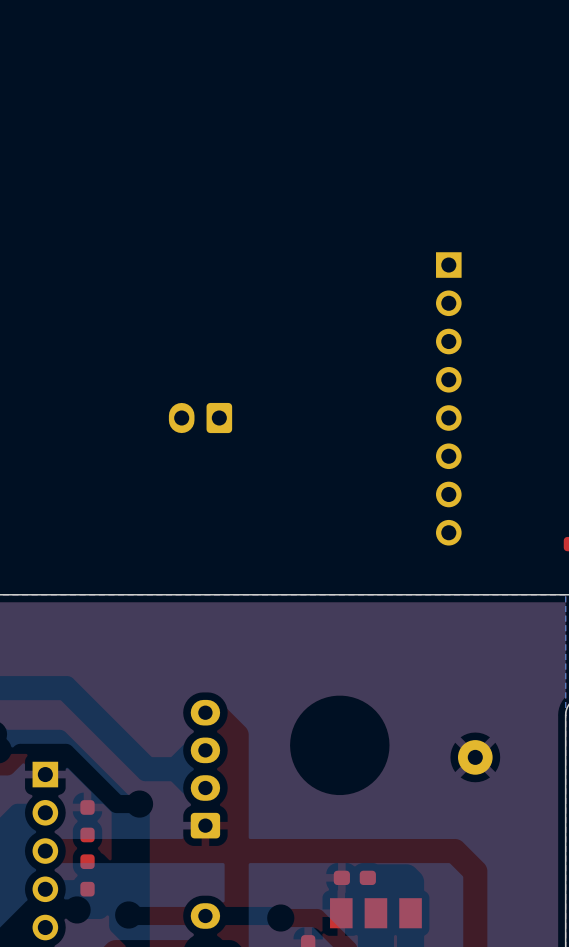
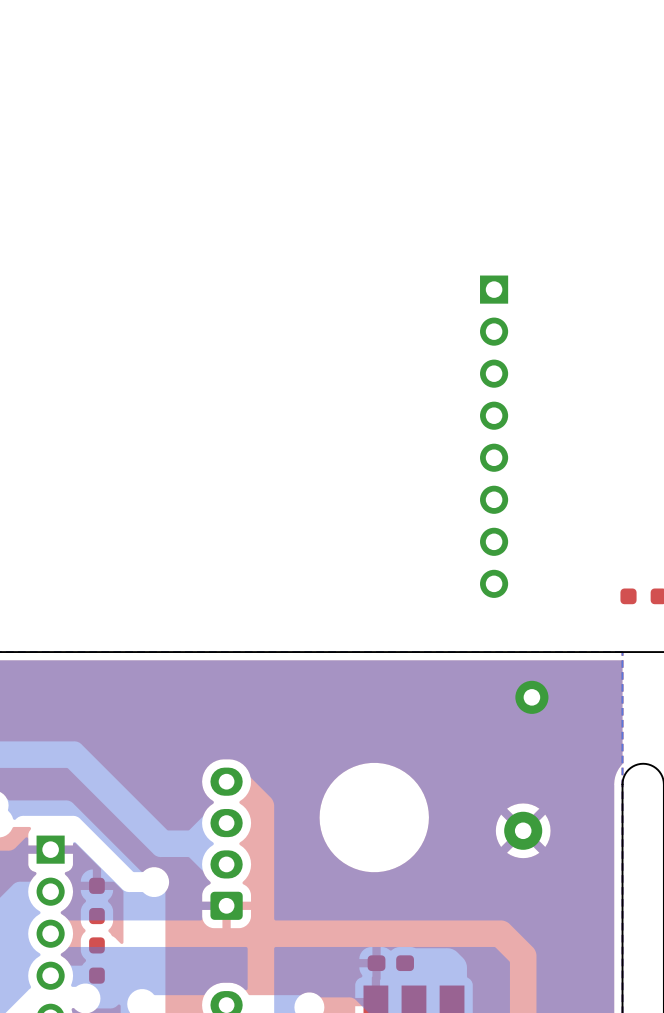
part: (200, 418) -> none
part: none -> (531, 697)

